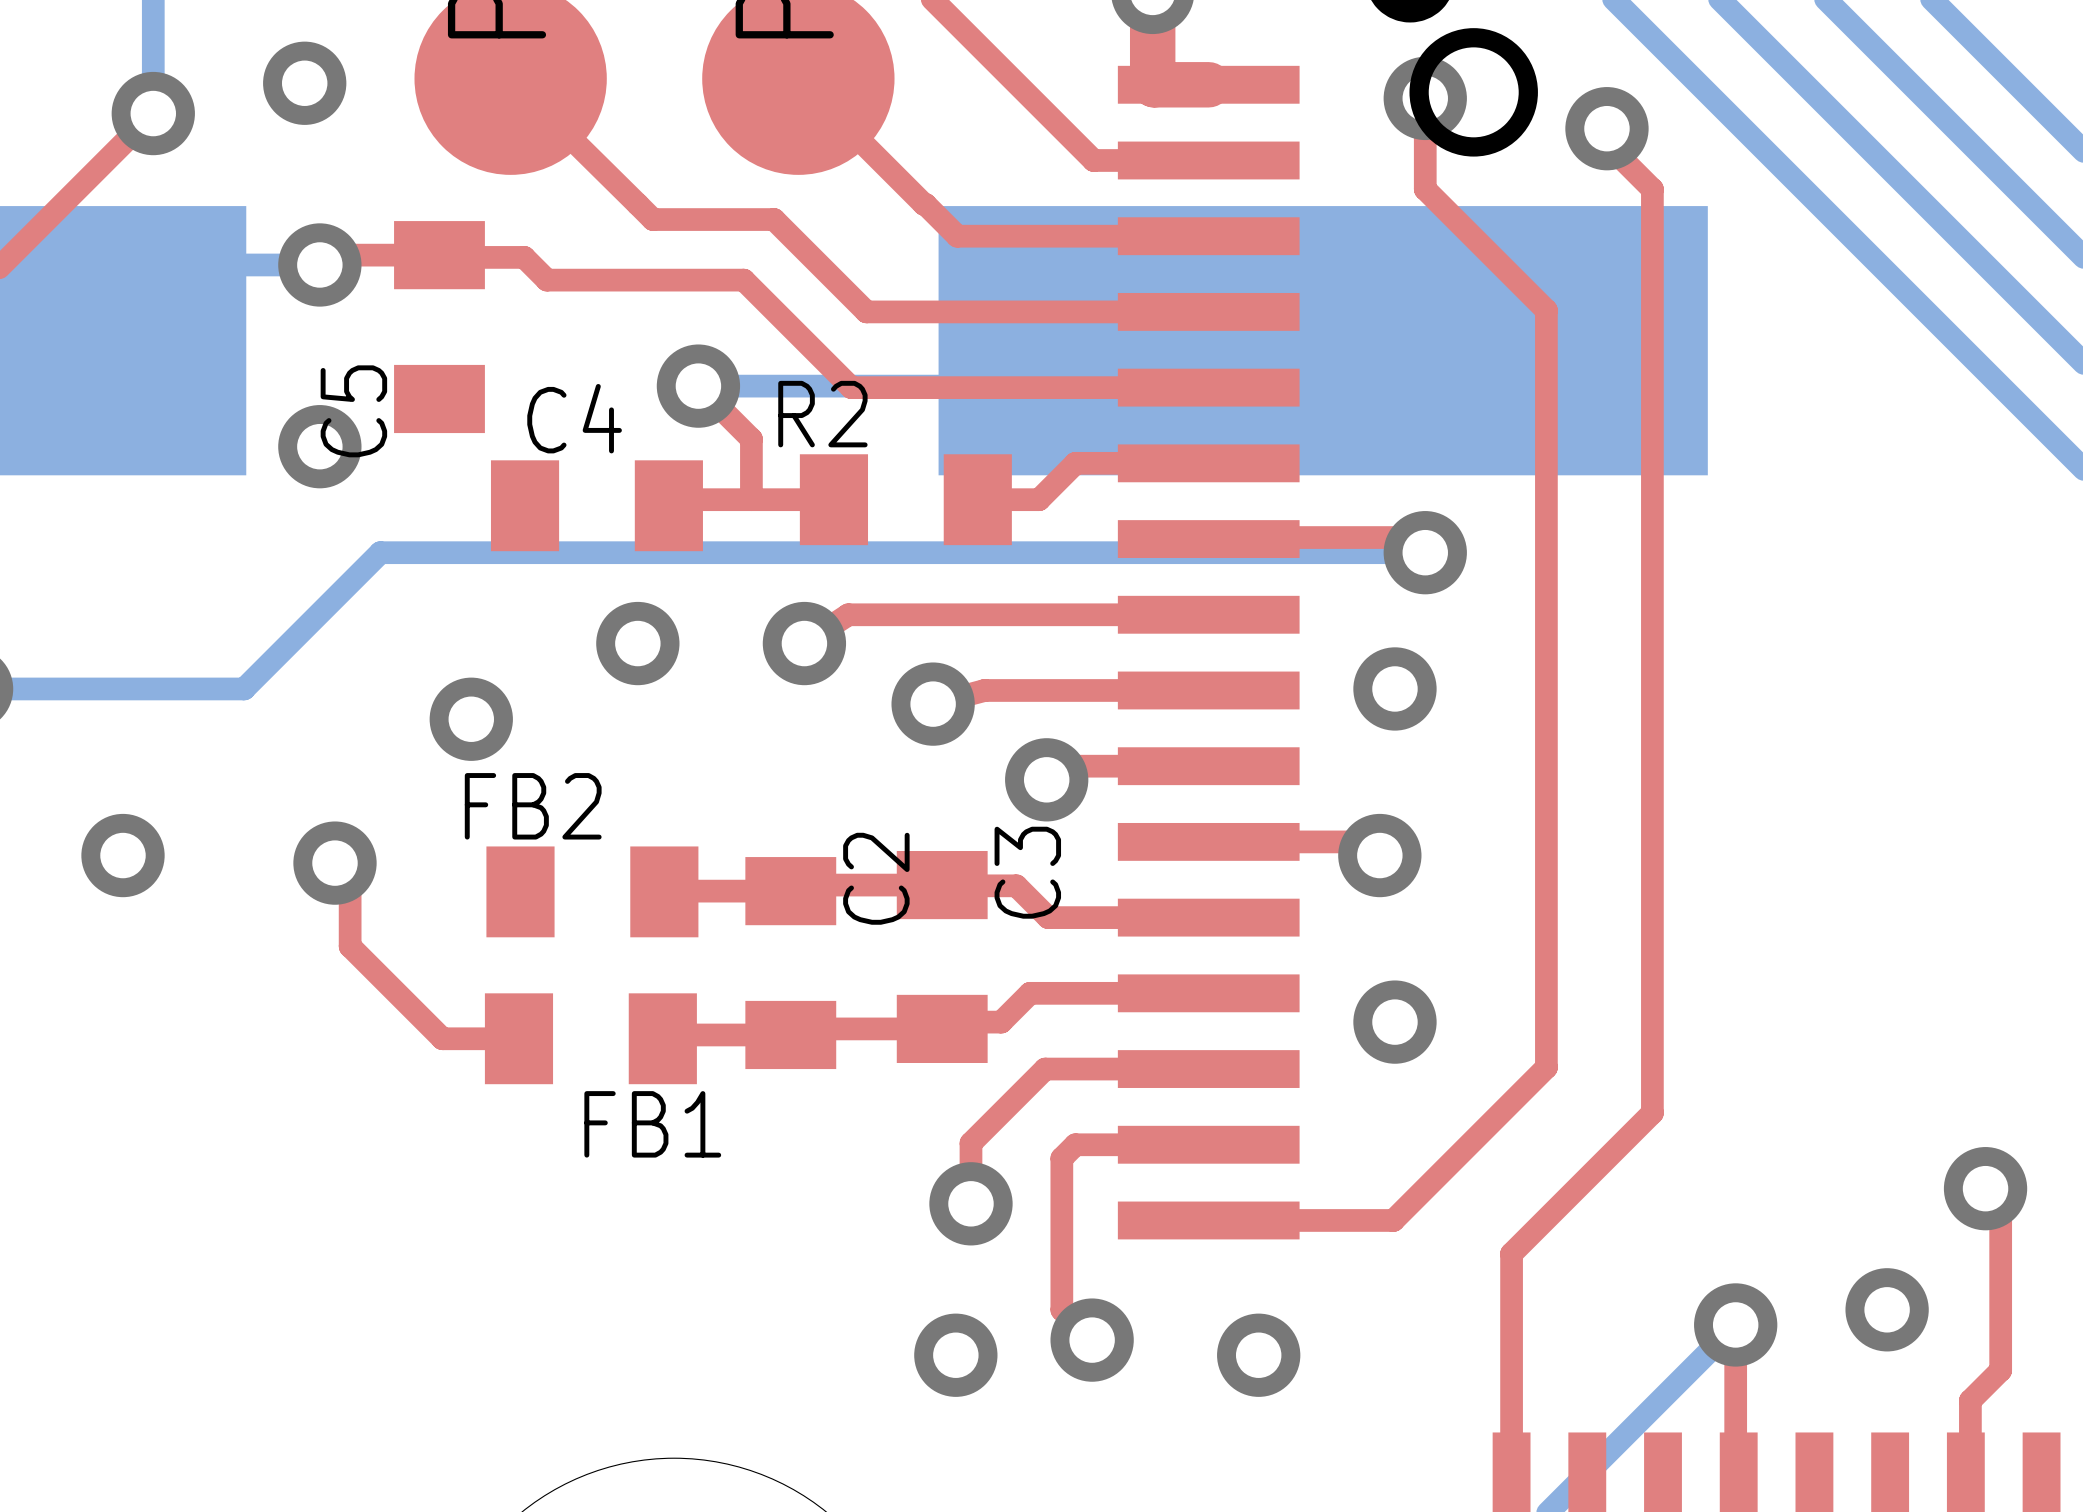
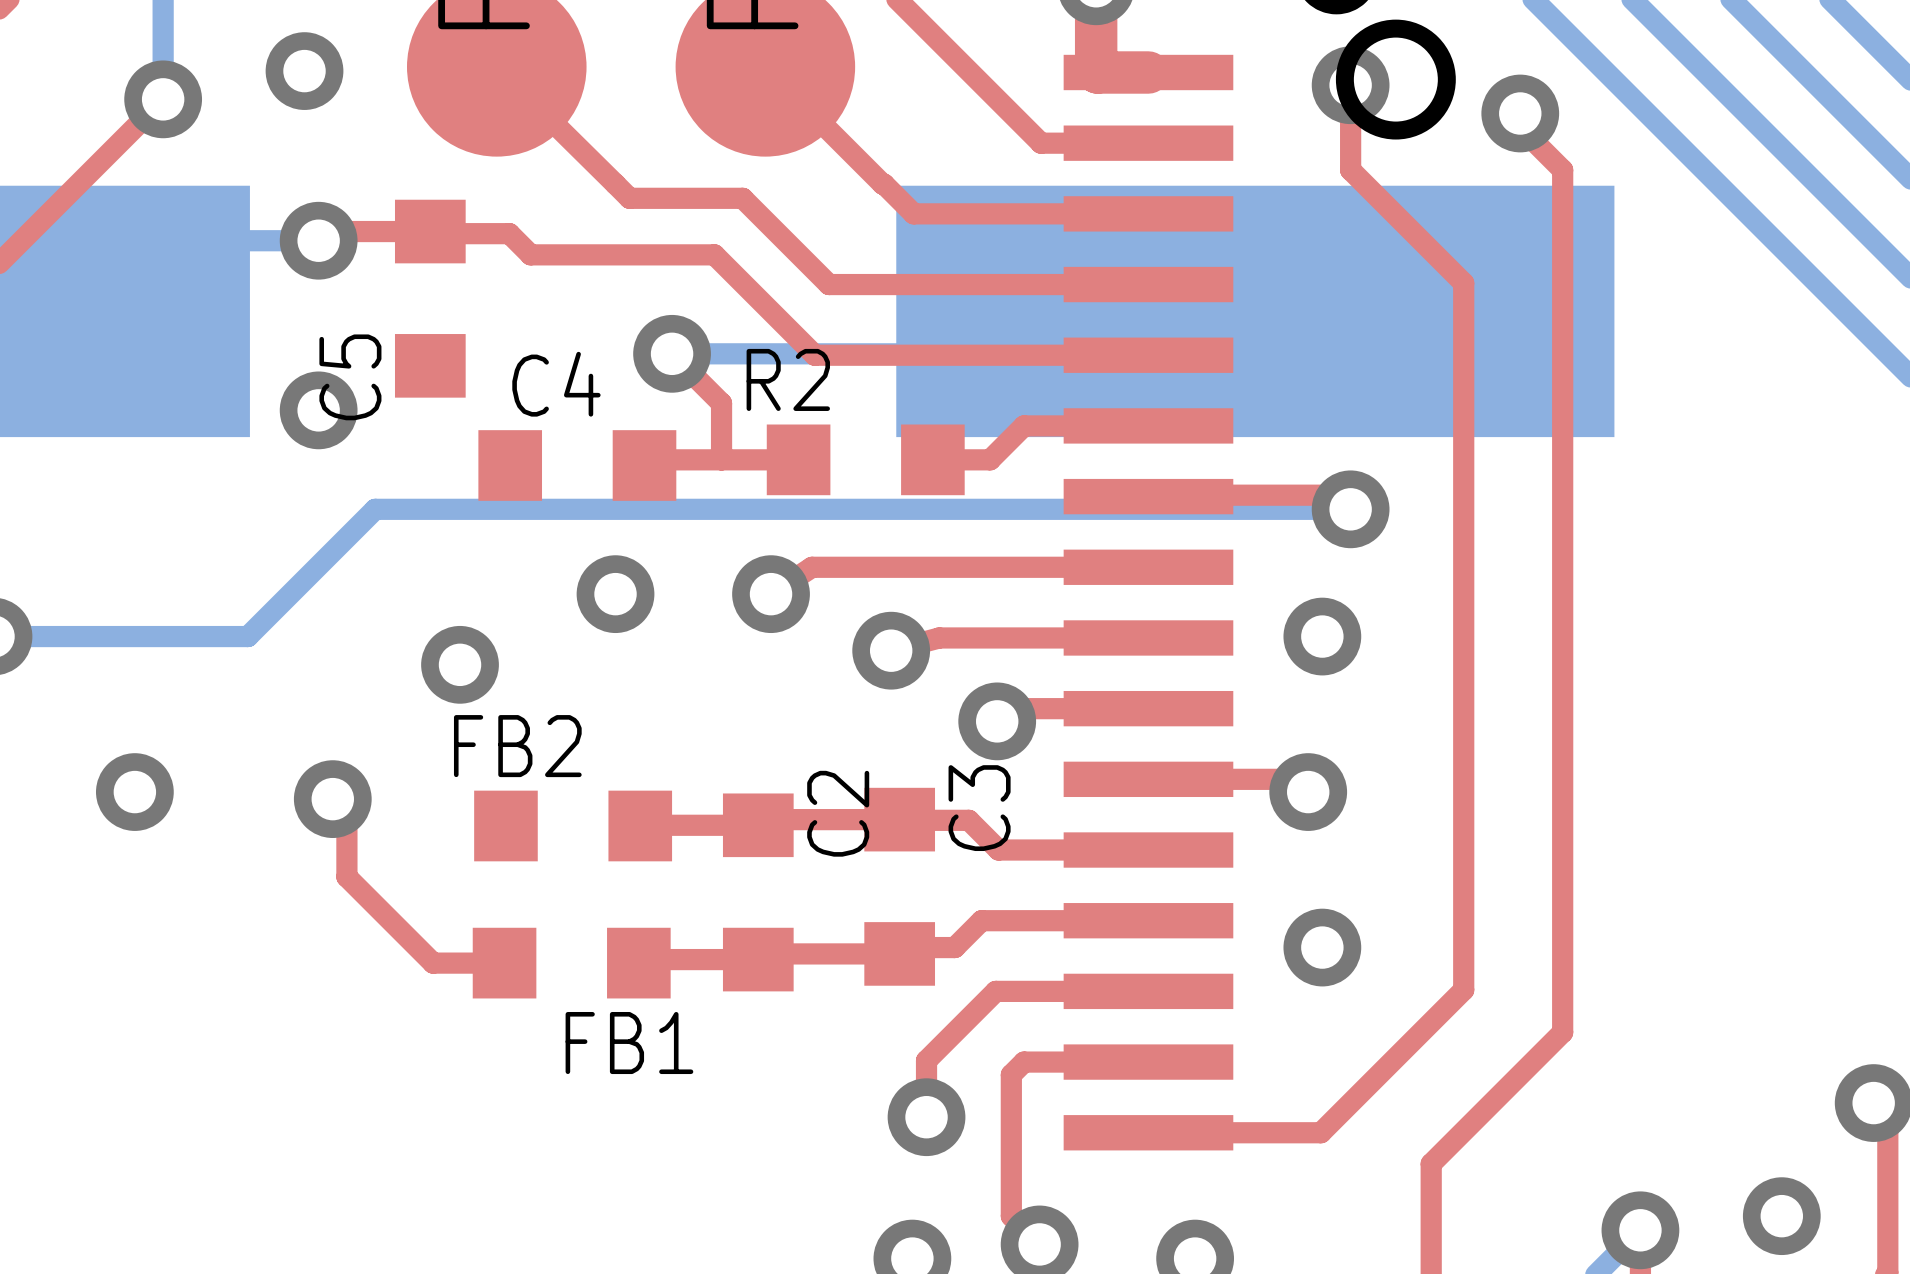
C5 footprint: [394, 221, 485, 434] -> [394, 199, 466, 398]
R2 footprint: [799, 454, 1012, 546] -> [766, 424, 965, 496]
C4 footprint: [490, 460, 703, 552] -> [478, 430, 677, 501]
FB2 footprint: [486, 846, 699, 938] -> [474, 790, 673, 862]
C3 footprint: [896, 850, 988, 1063] -> [864, 787, 936, 986]
C2 footprint: [745, 857, 837, 1070] -> [722, 793, 794, 992]
FB1 footprint: [484, 993, 697, 1085] -> [472, 927, 671, 999]

